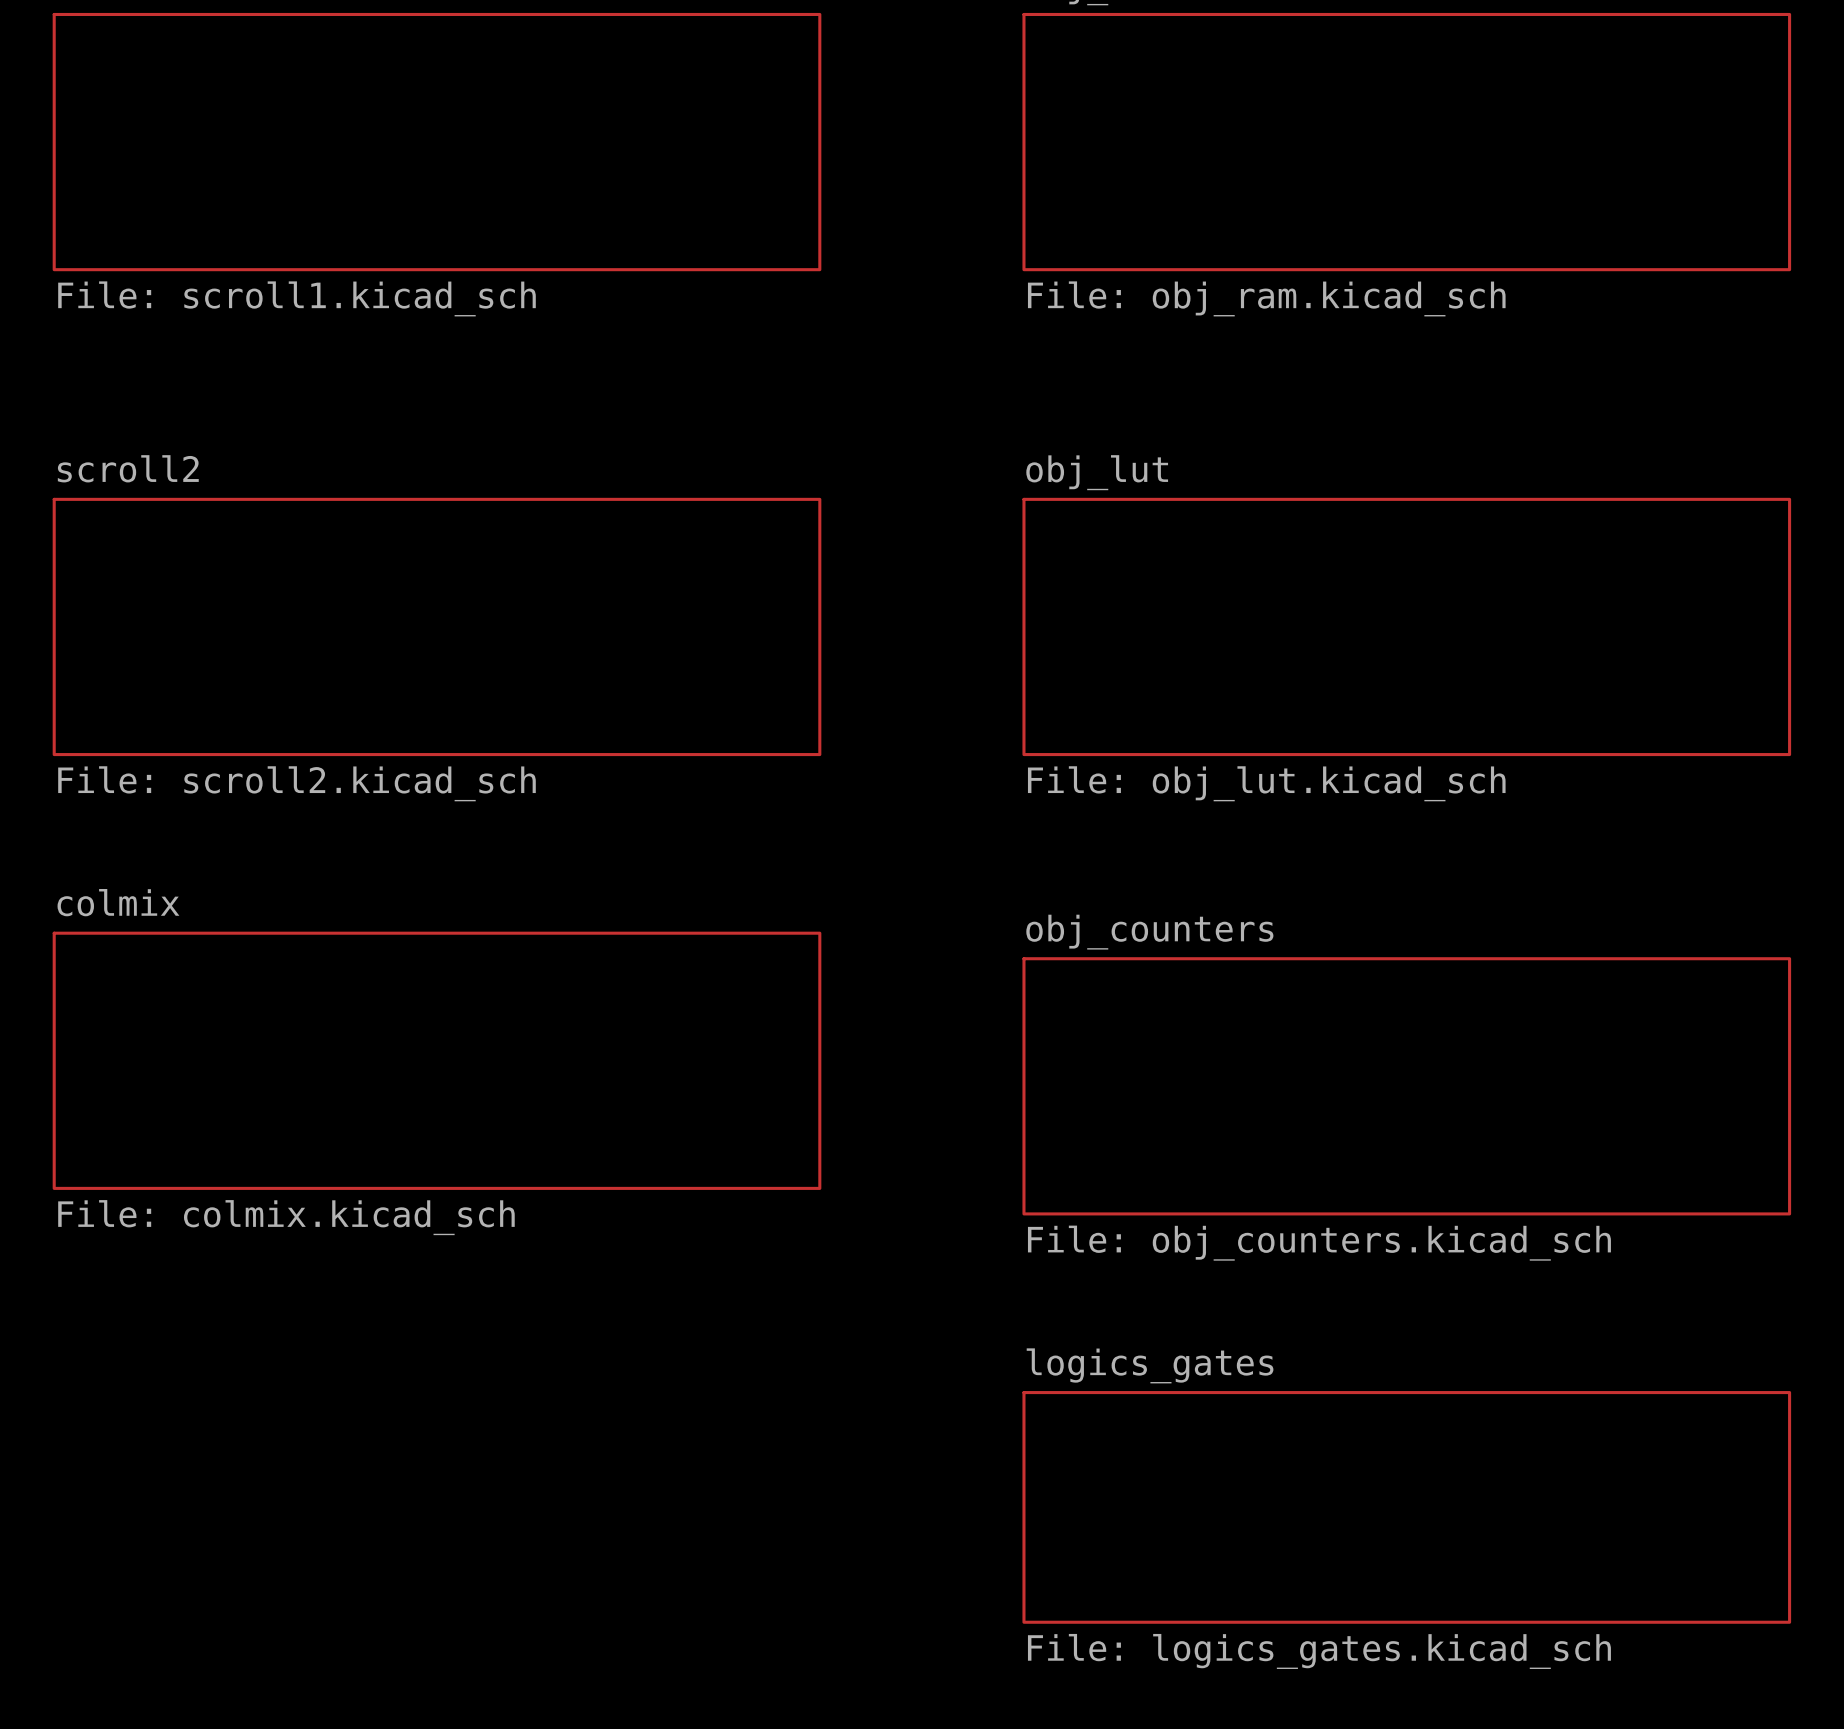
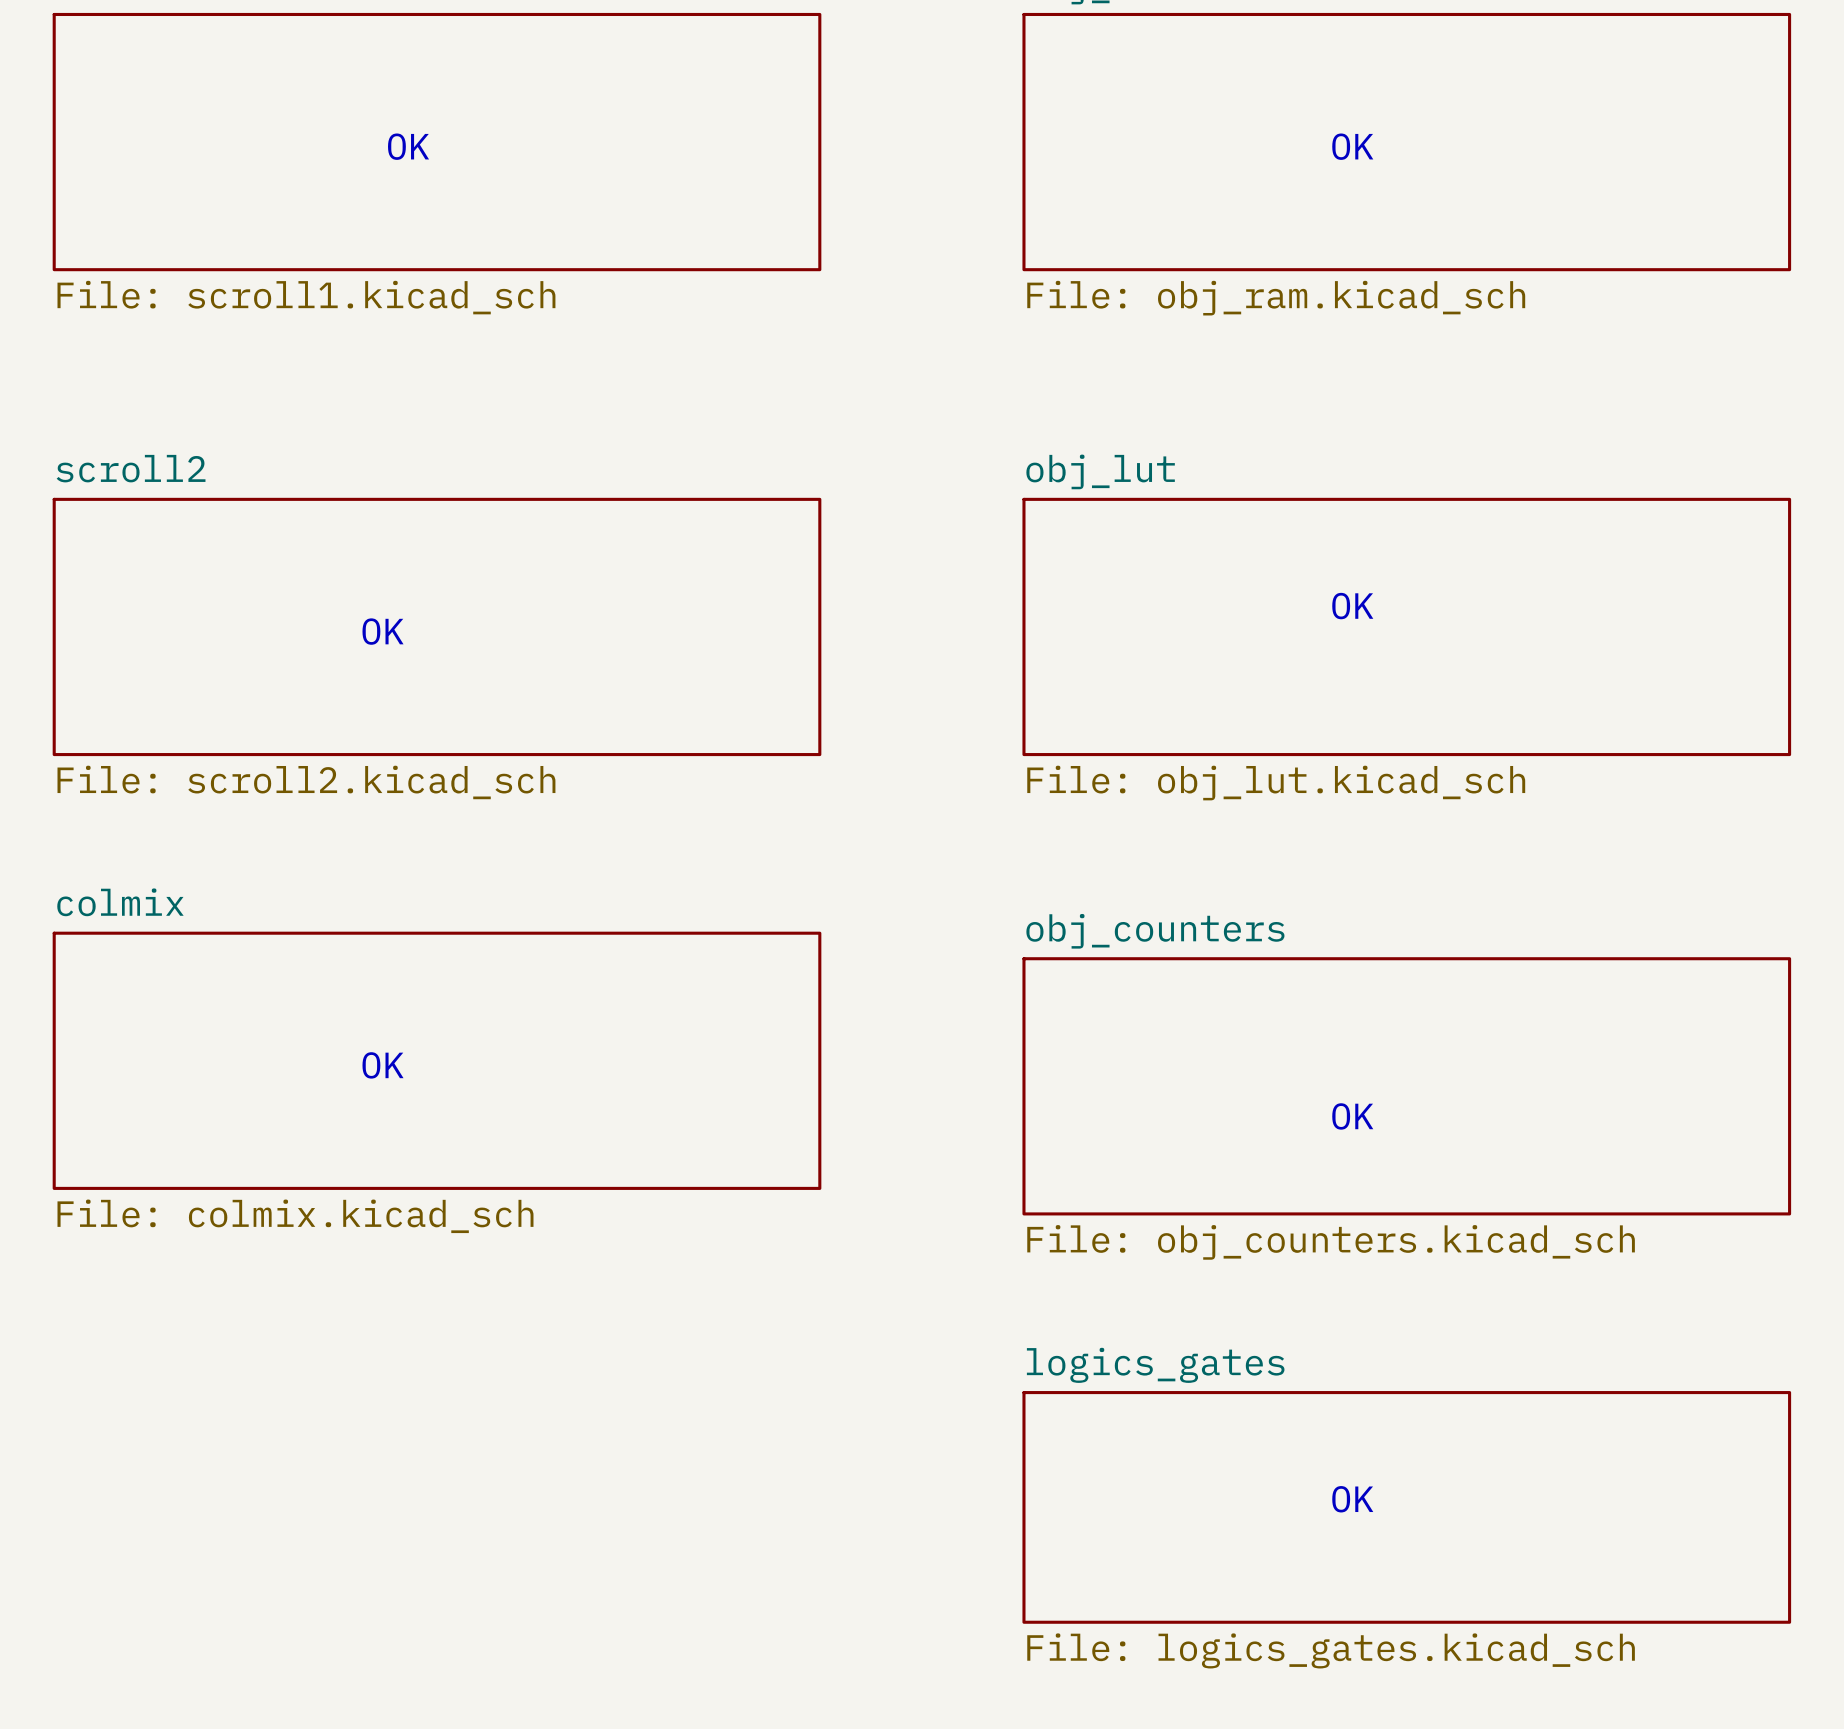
text: none -> OK (408, 146)
text: none -> OK (1352, 146)
text: none -> OK (1352, 606)
text: none -> OK (383, 631)
text: none -> OK (383, 1065)
text: none -> OK (1352, 1116)
text: none -> OK (1352, 1499)

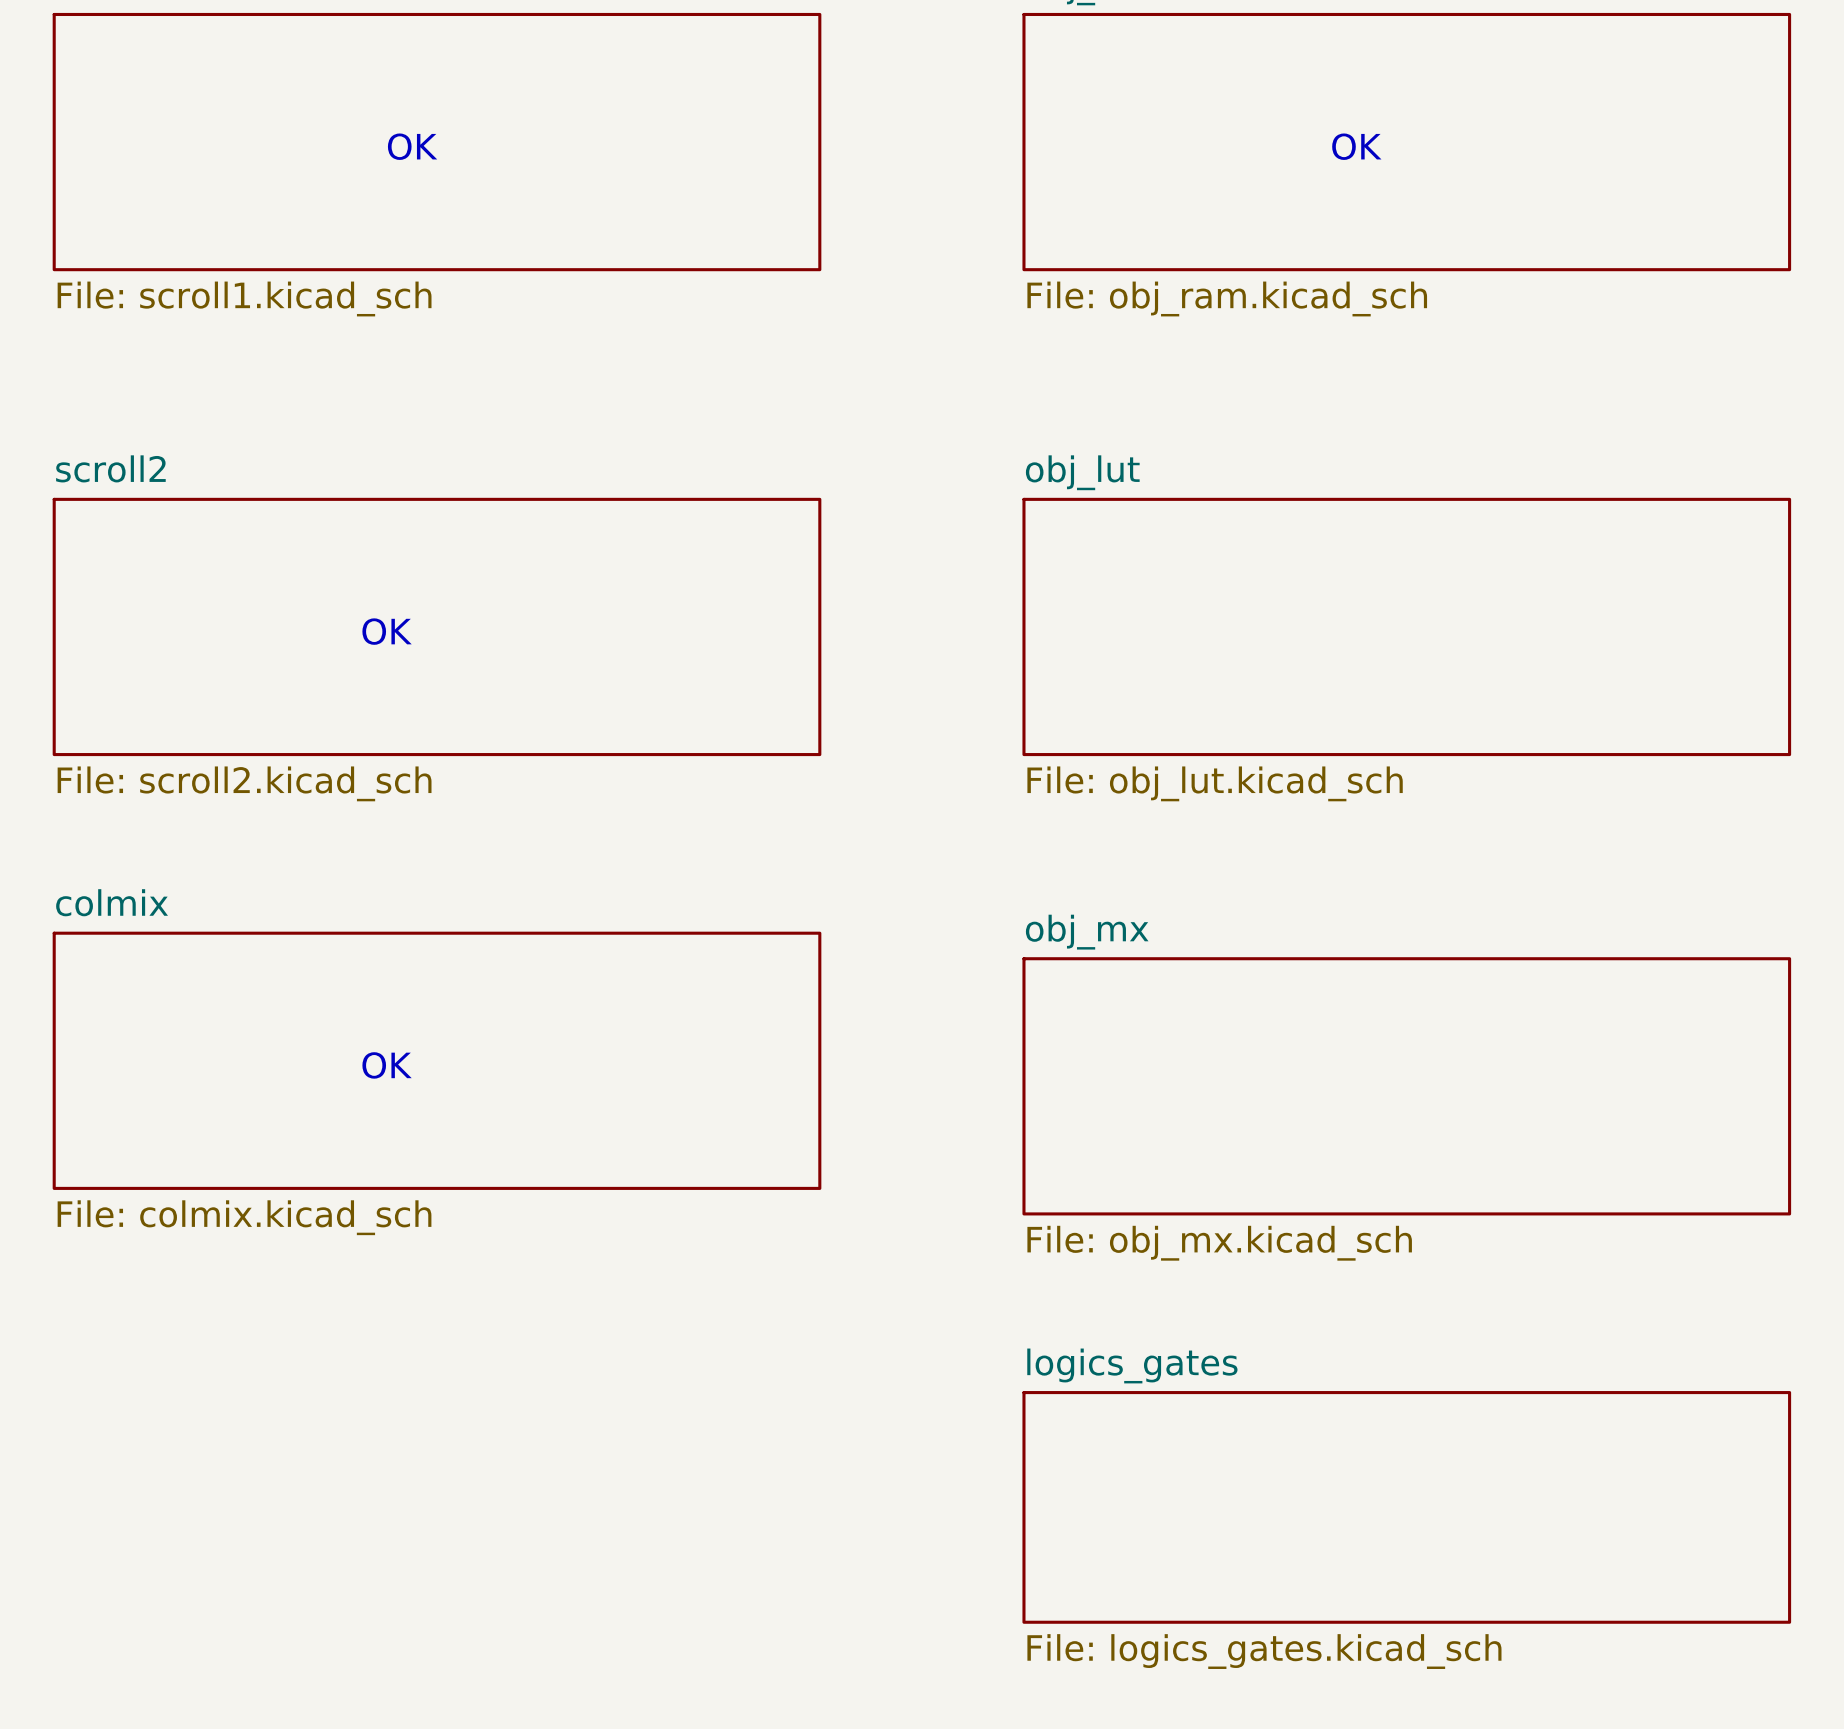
text: OK (1352, 606) -> none
sheet obj_counters name: obj_counters (1155, 931) -> obj_mx (1087, 932)
text: OK (1352, 1116) -> none
sheet obj_counters value: File: obj_counters.kicad_sch (1331, 1242) -> File: obj_mx.kicad_sch (1219, 1243)
text: OK (1352, 1499) -> none

